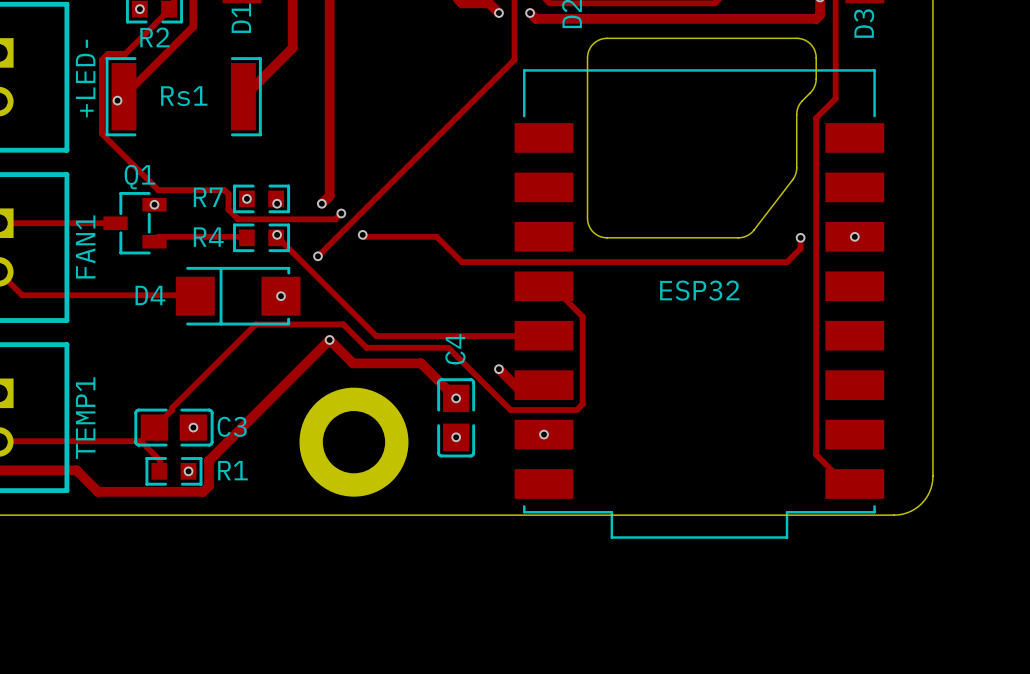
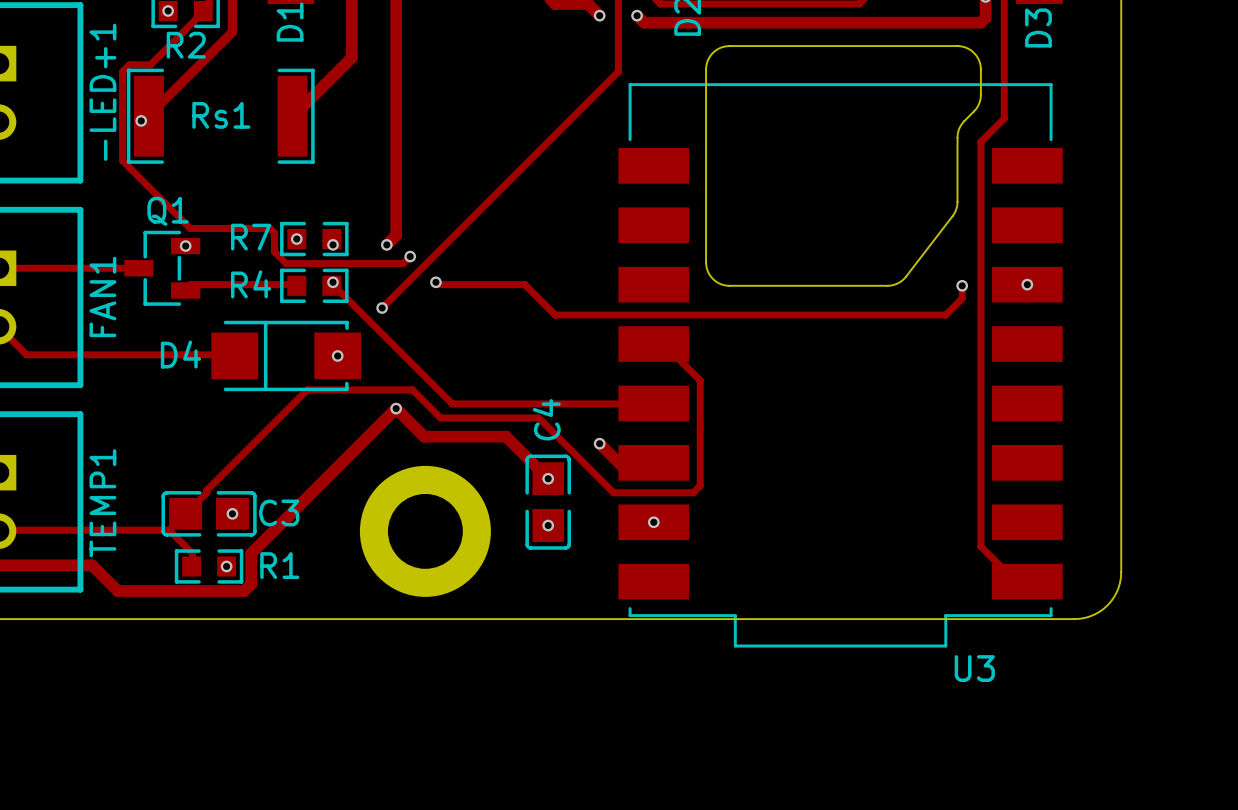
+LED- name: +LED- (85, 78) -> -LED+1 (102, 92)
ESP32 name: ESP32 (699, 290) -> U3 (974, 668)

